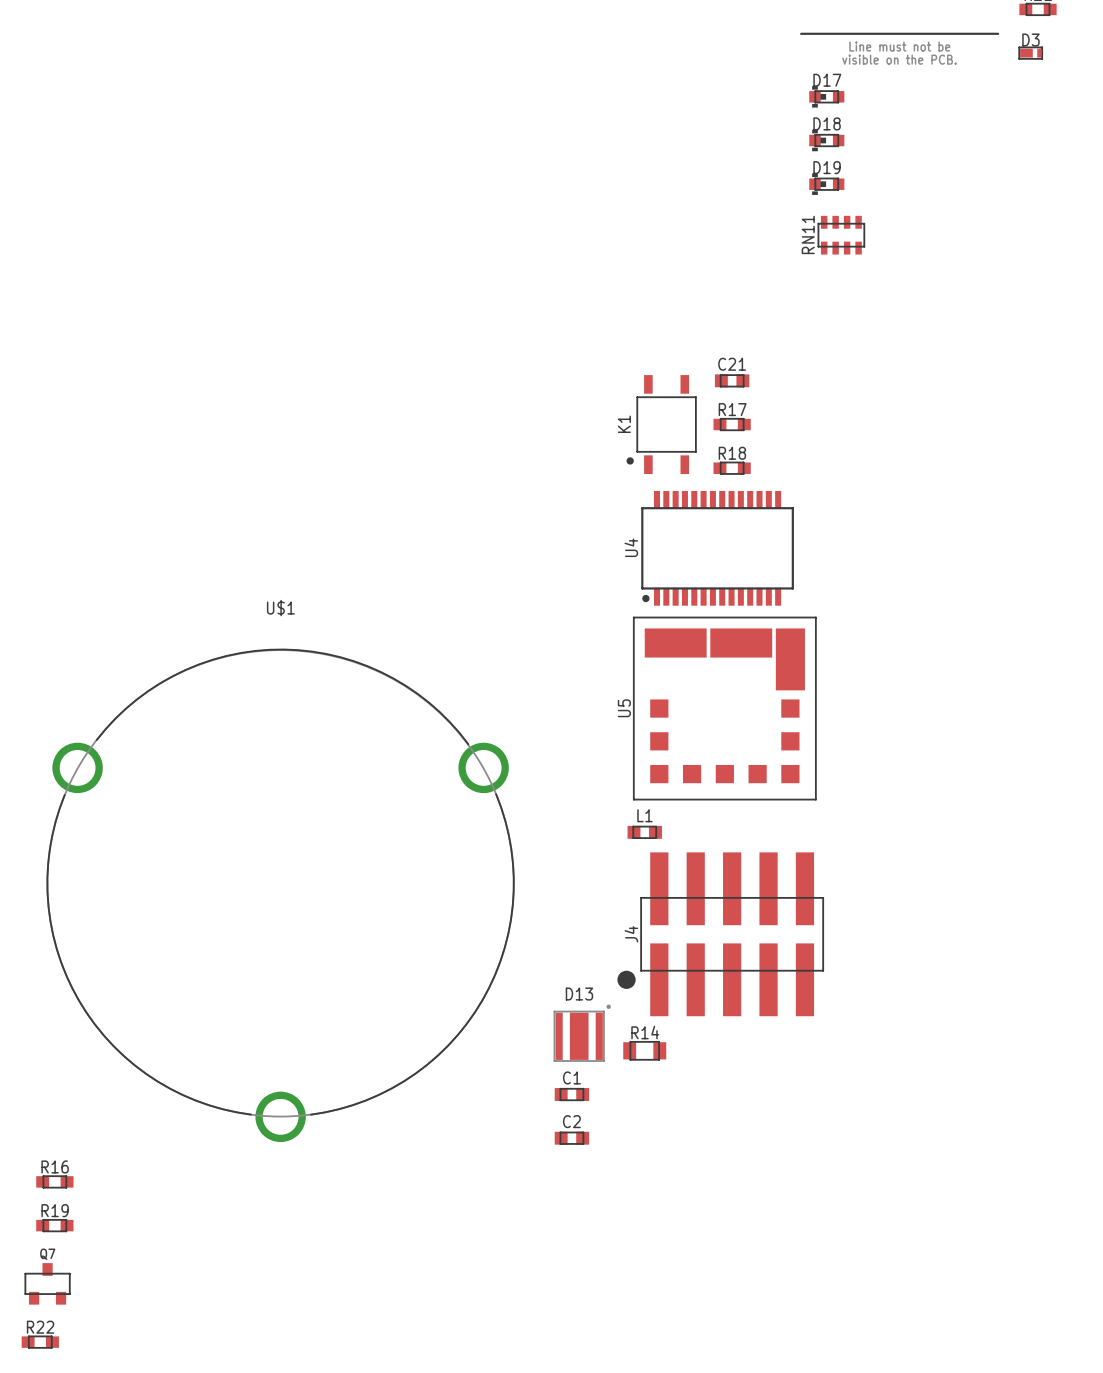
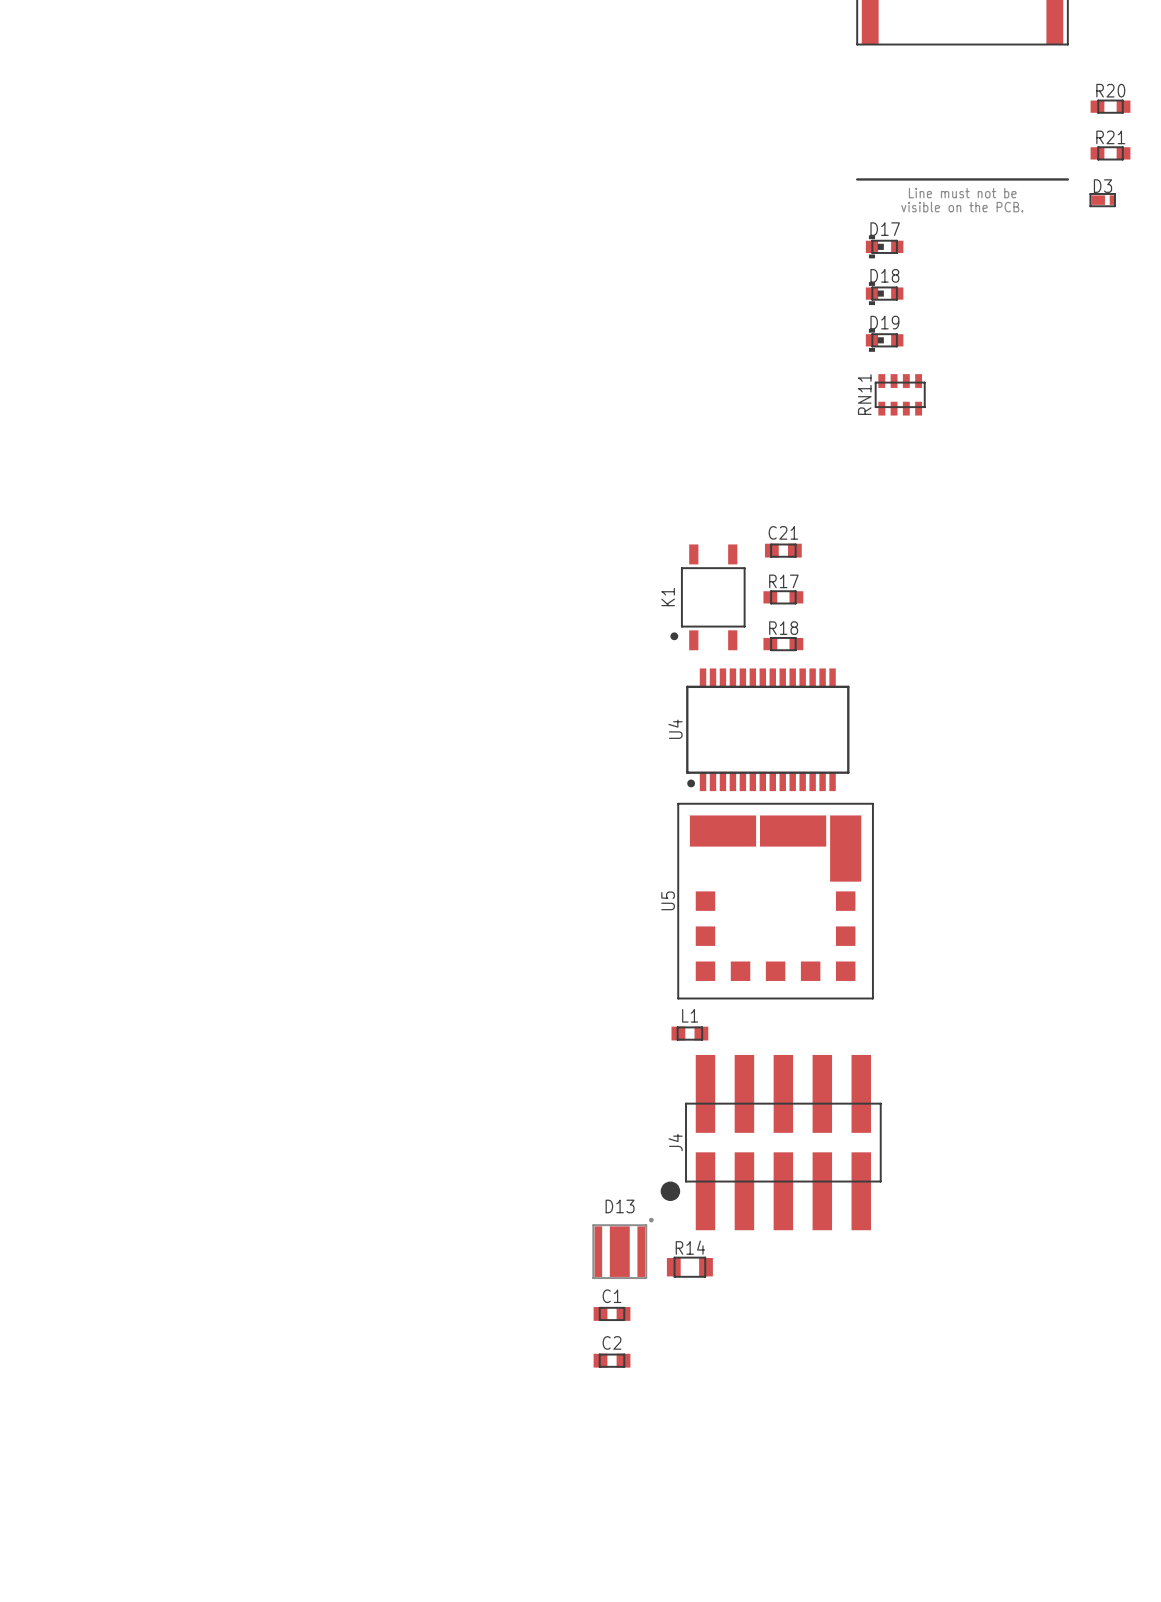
U$1: (280, 895) -> none
R16: (54, 1181) -> none
R19: (54, 1225) -> none
Q7: (47, 1283) -> none
R22: (40, 1342) -> none

